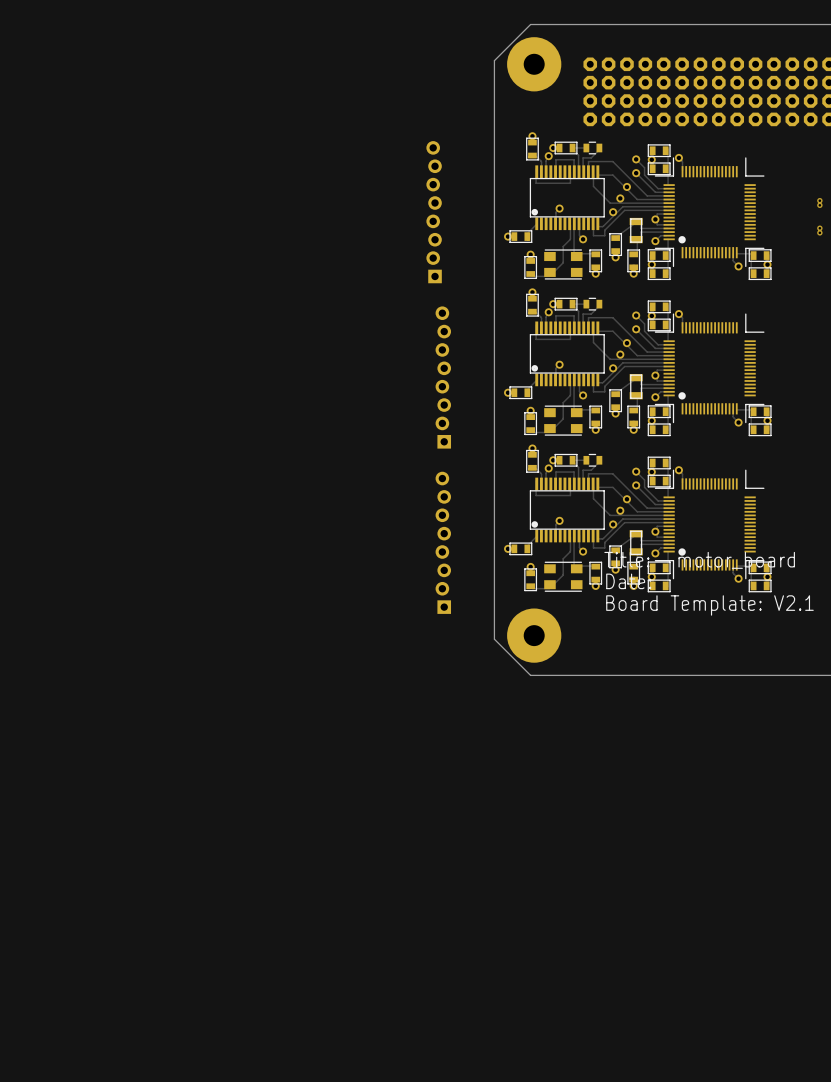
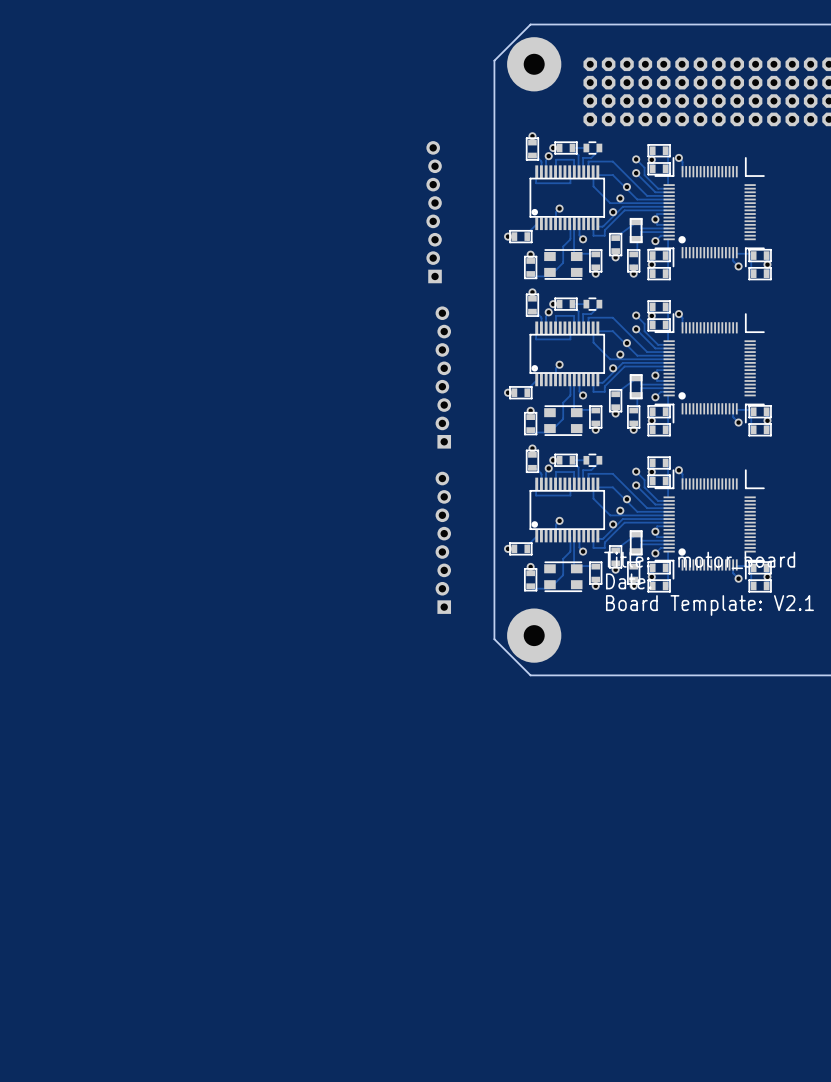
via: (819, 200) -> none
via: (819, 205) -> none
via: (819, 228) -> none
via: (819, 232) -> none

